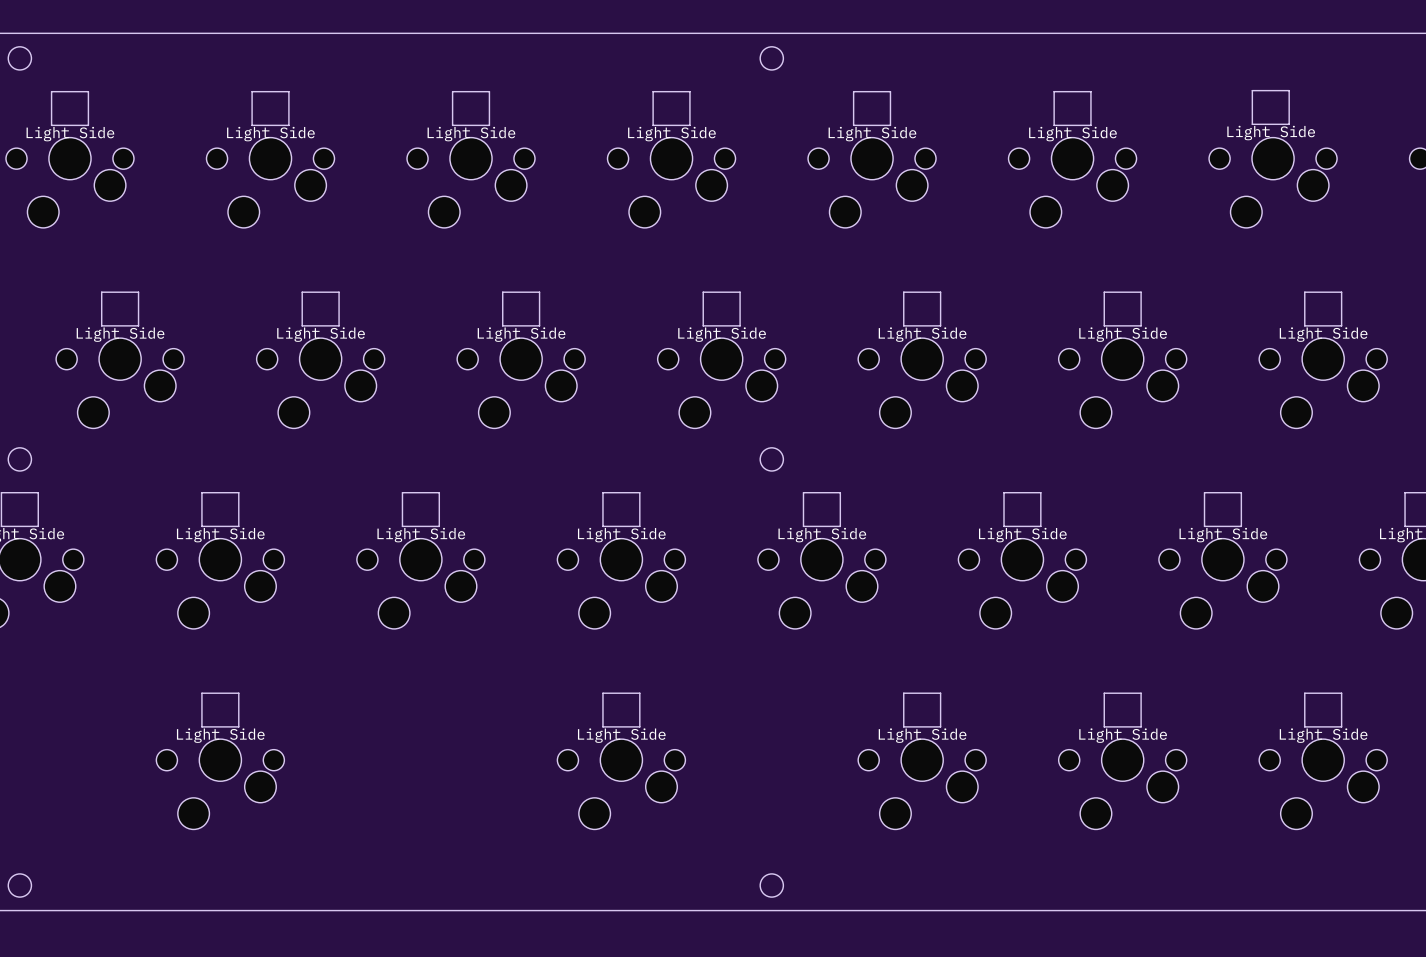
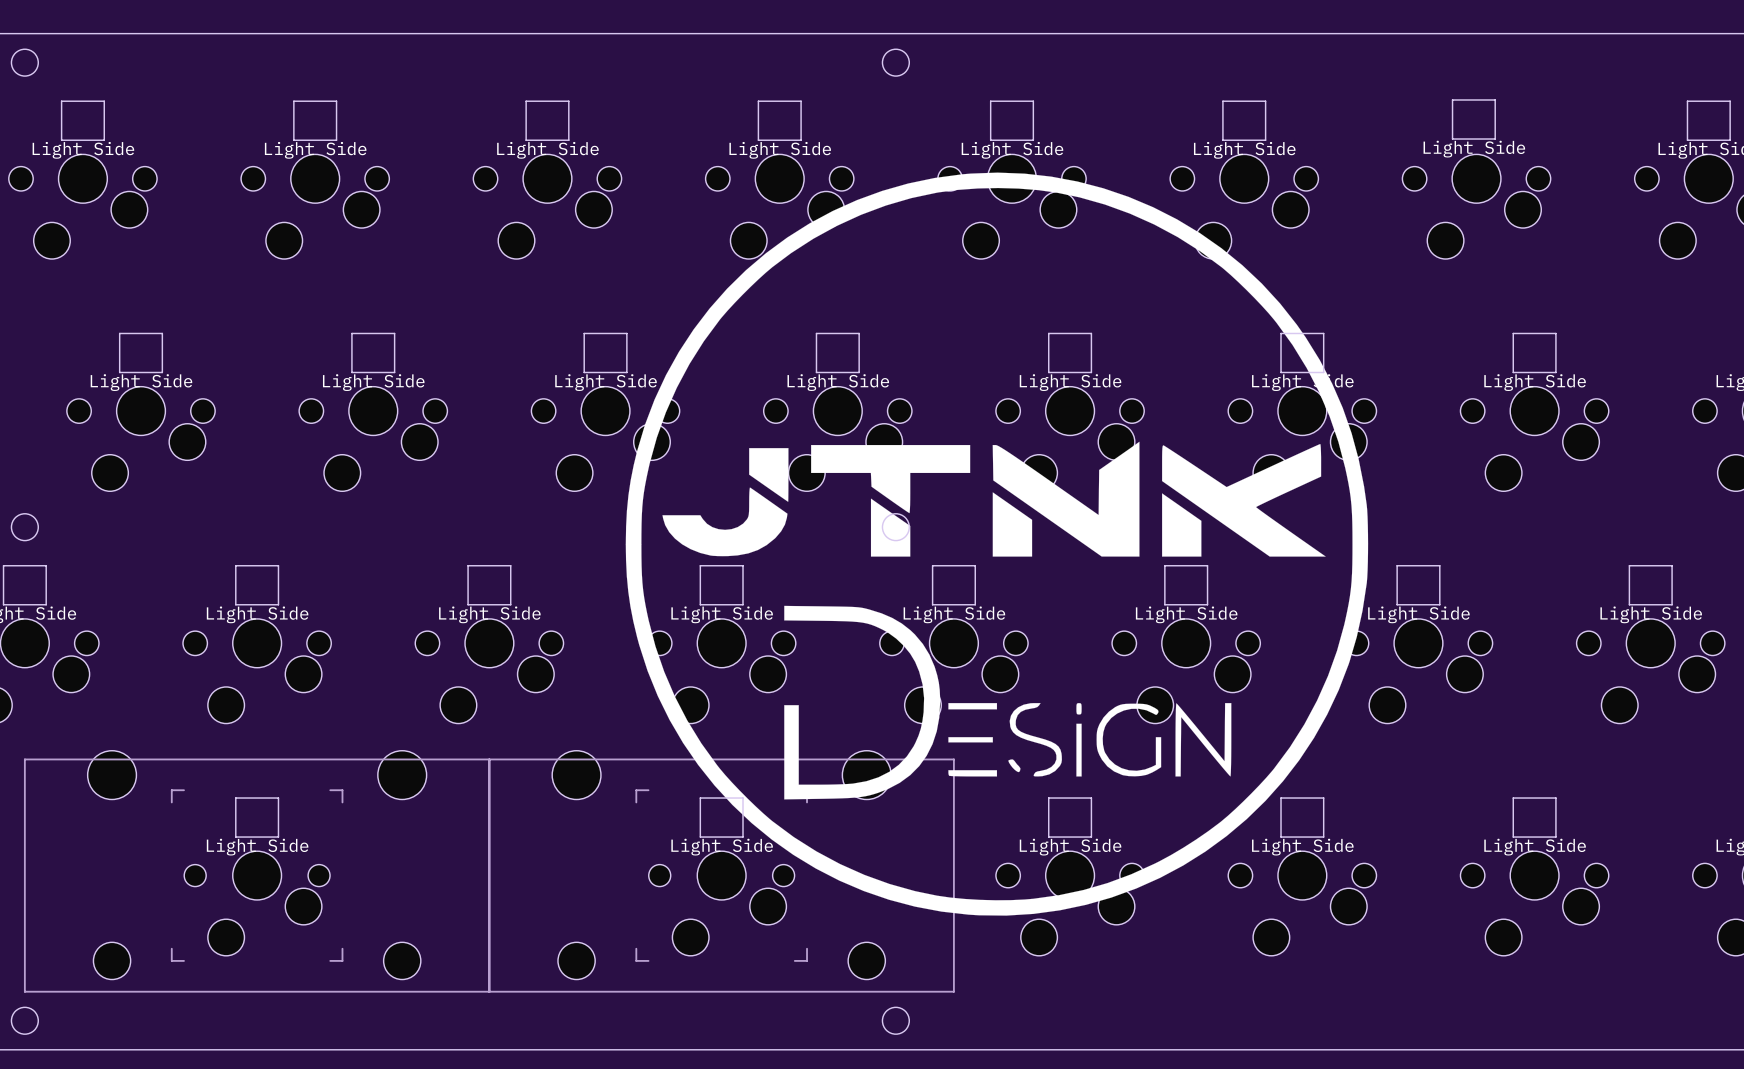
drawing: none -> [625, 172, 1369, 916]
part: none -> (257, 871)
part: none -> (721, 871)
part: (220, 784) -> none
part: (621, 784) -> none

